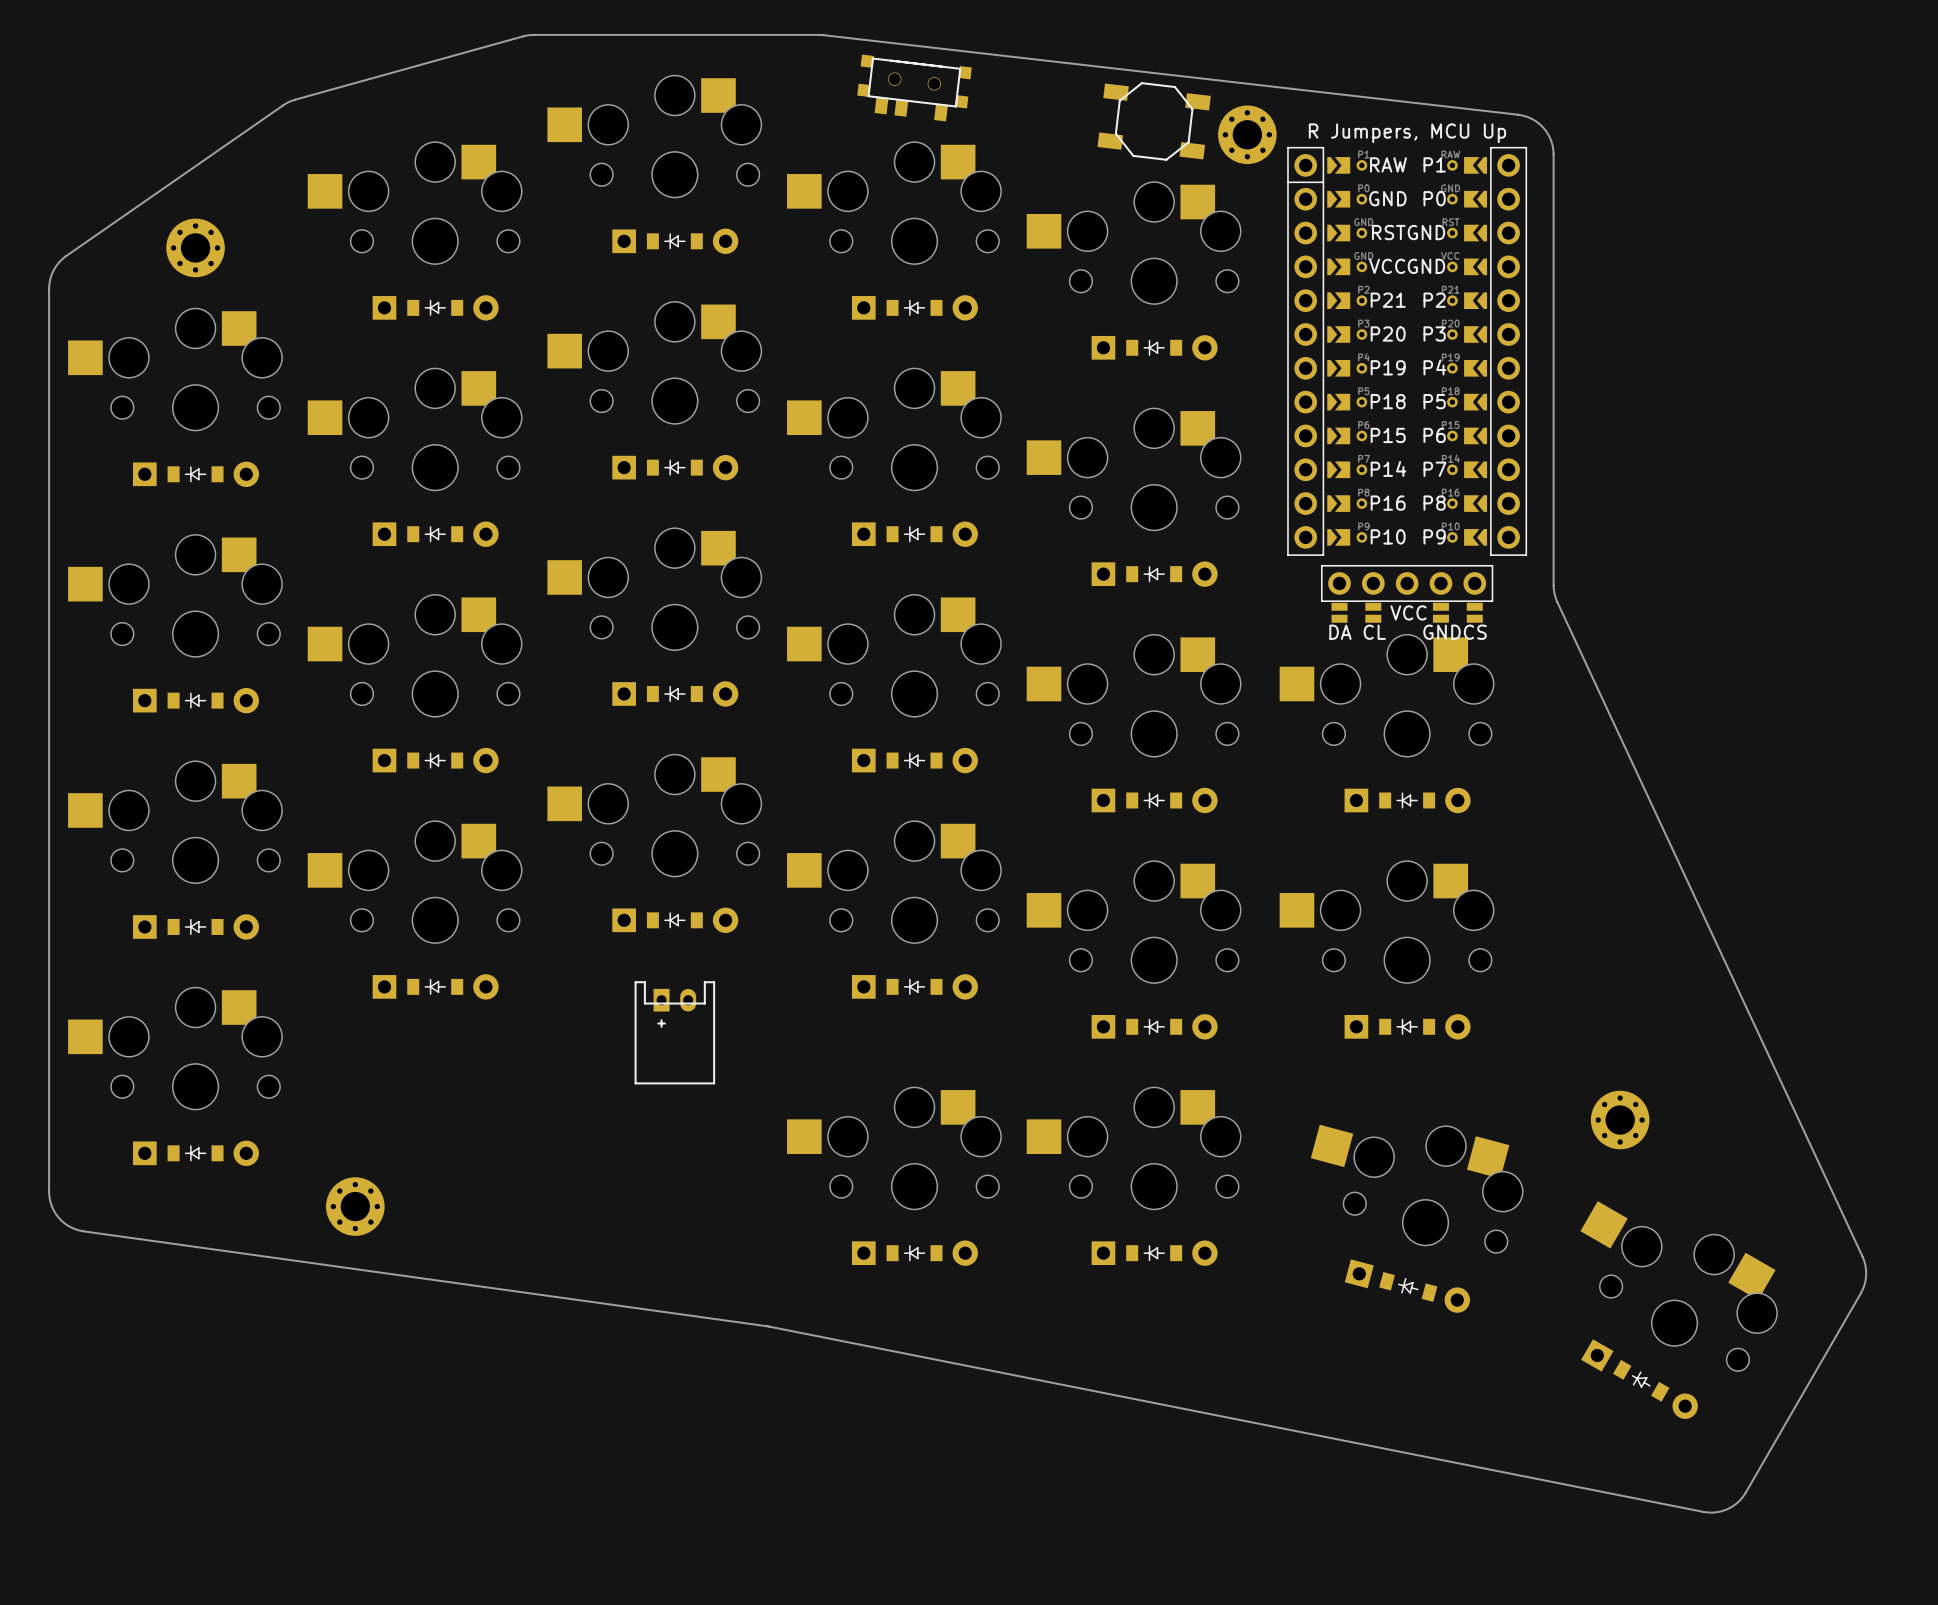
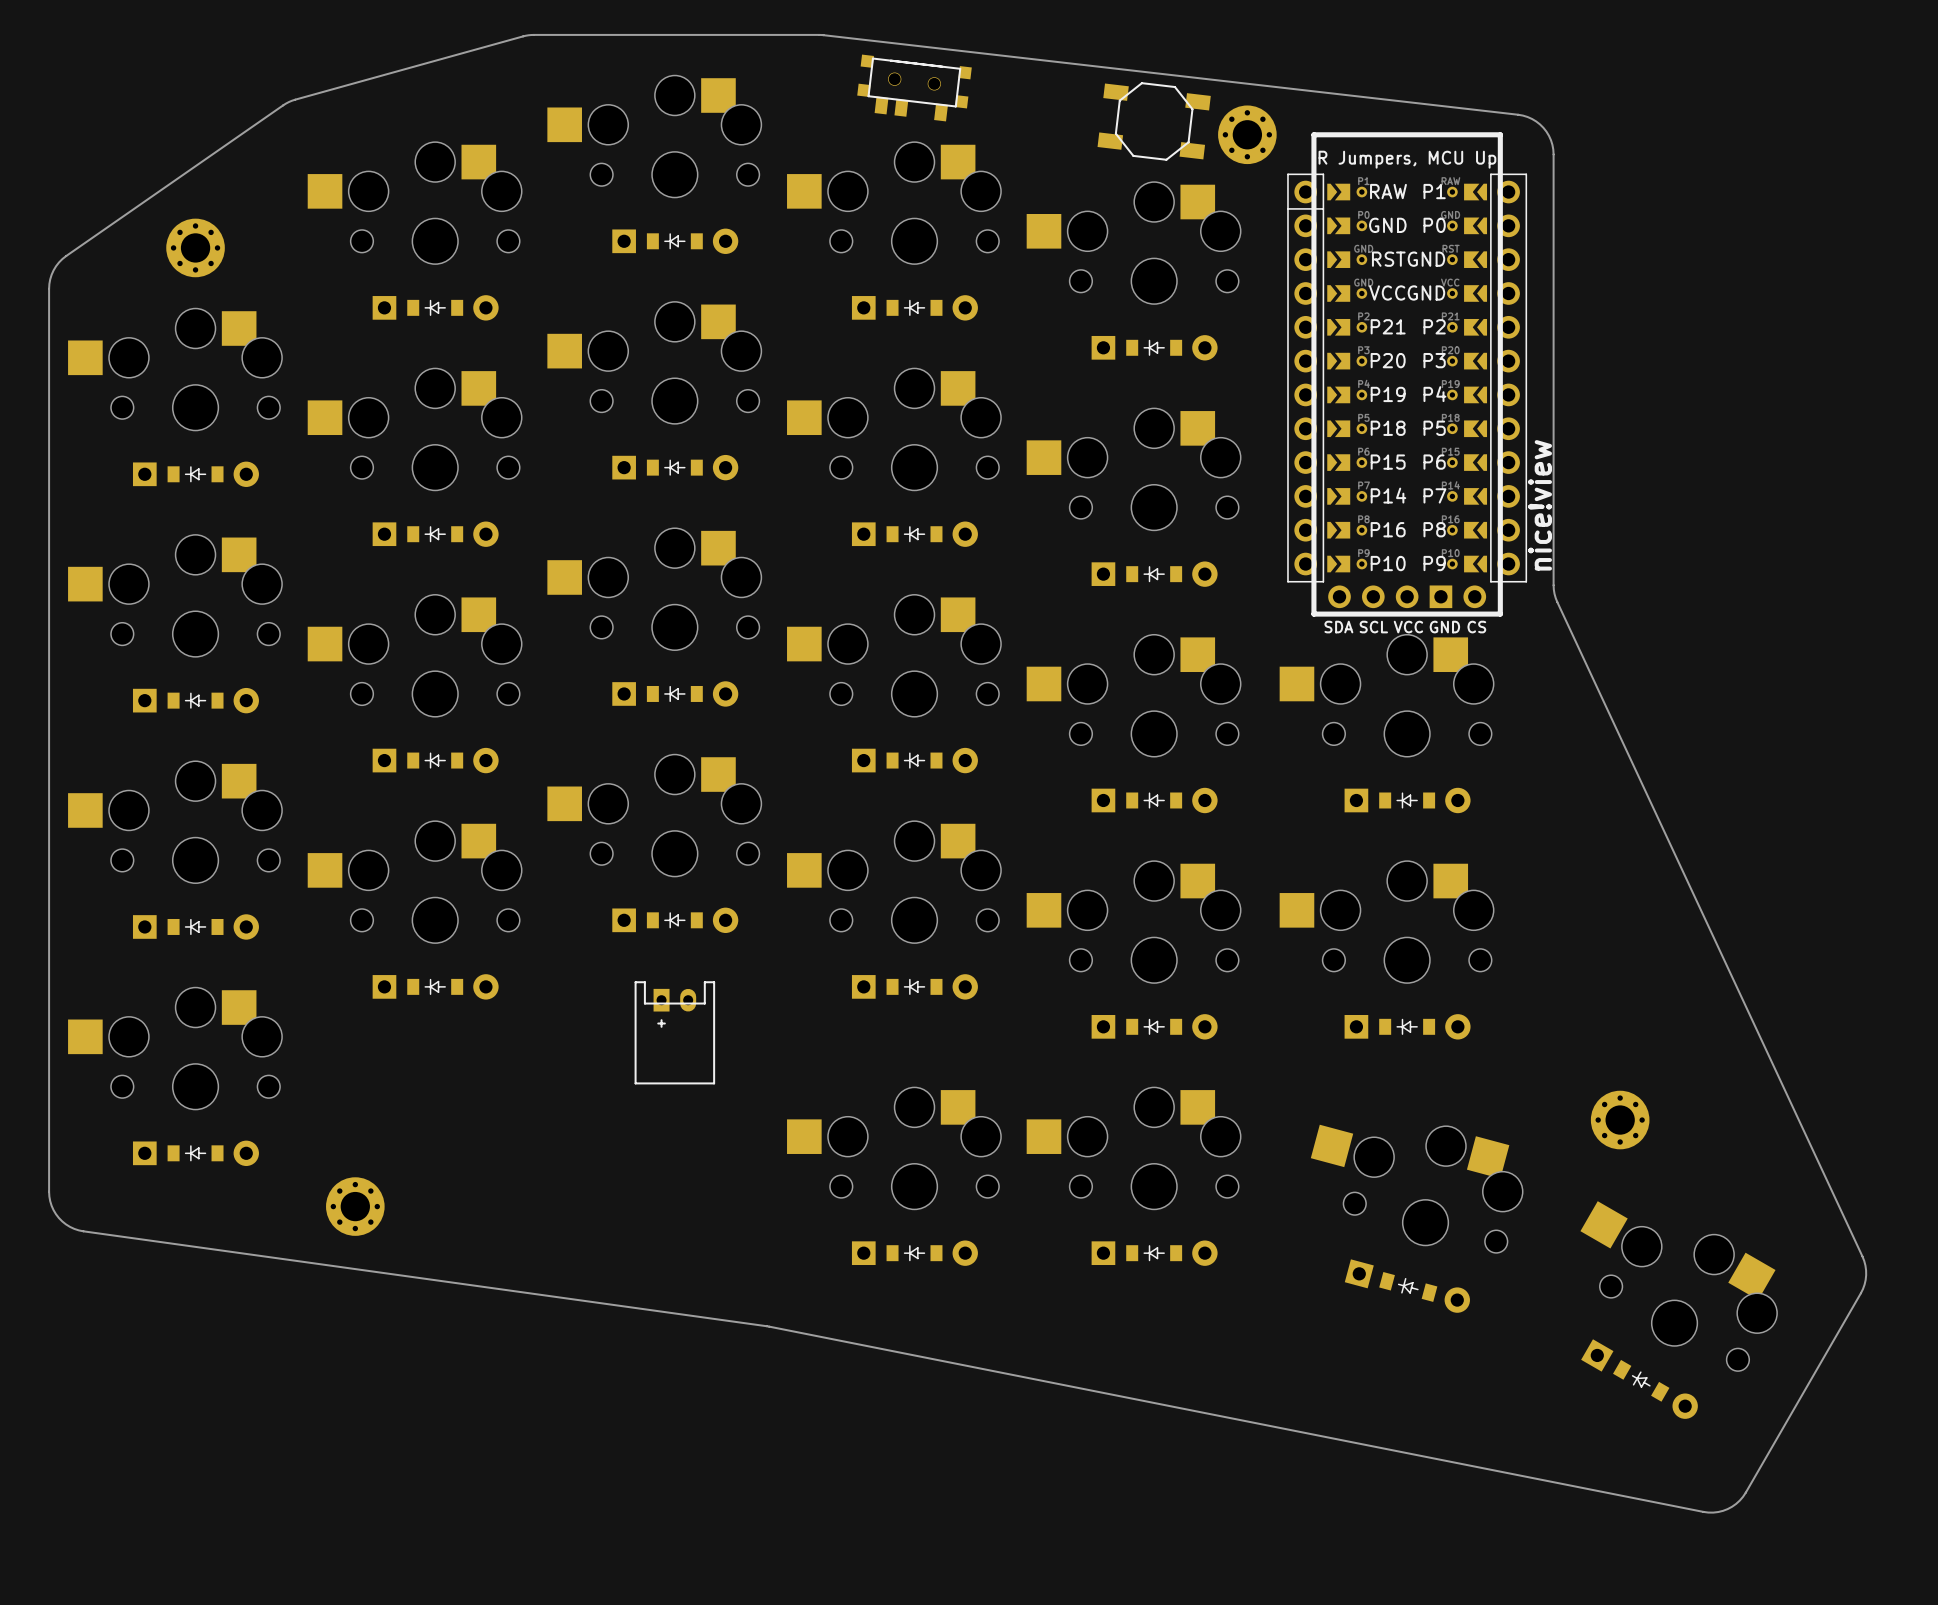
part: (1407, 351) -> none
part: none -> (1407, 374)
part: none -> (1407, 378)
part: (1407, 593) -> none

